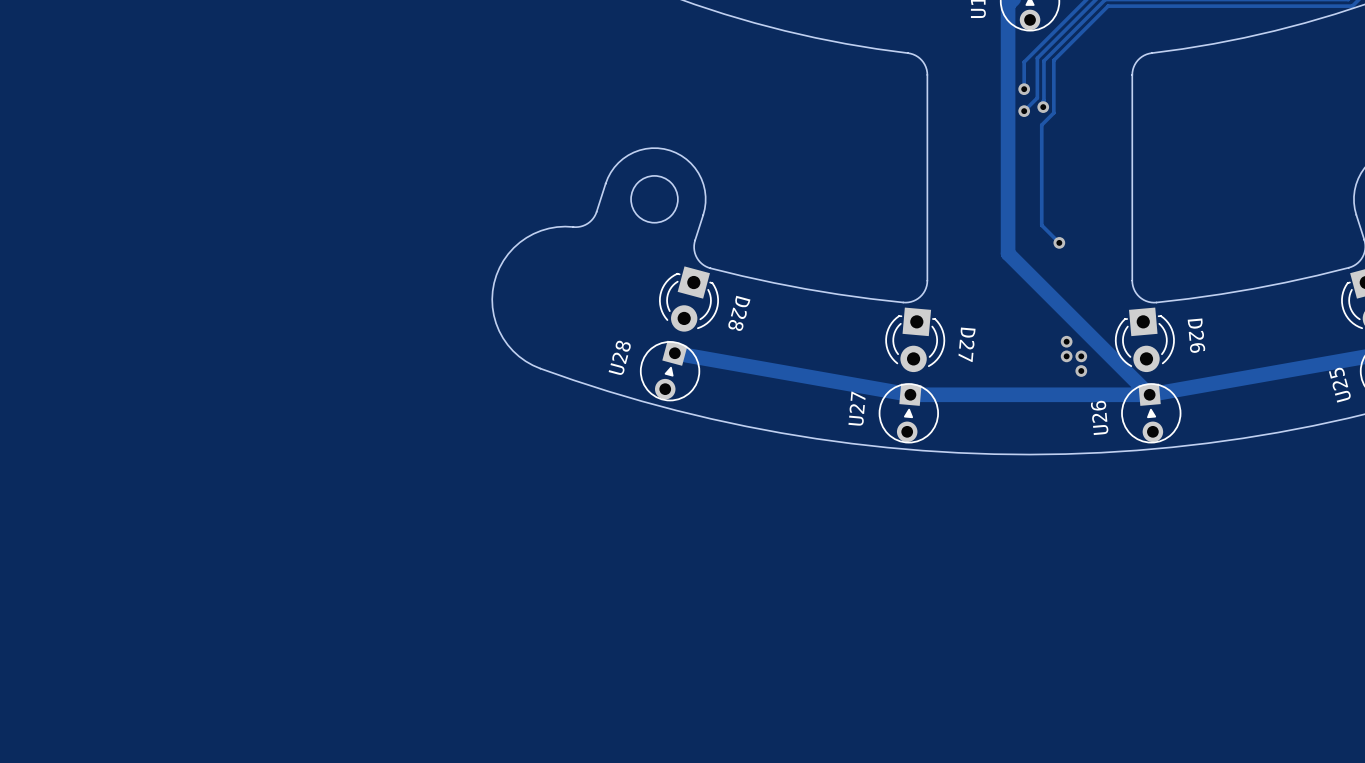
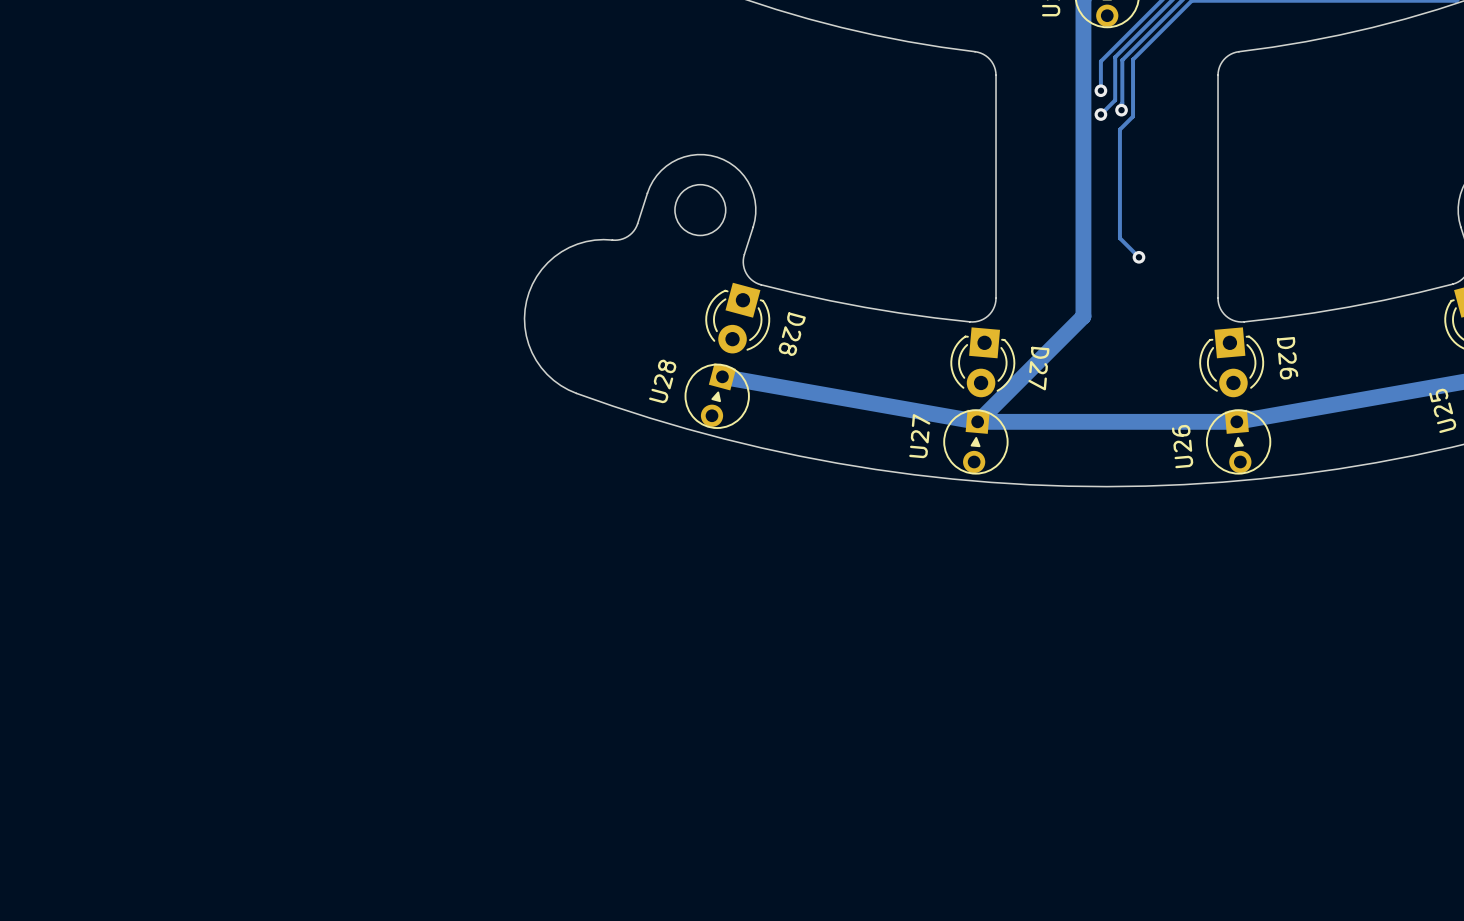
track: (1008, 253) (1149, 394) -> (1083, 268) (1083, 316) (978, 421)
via: (1066, 341) -> none
via: (1066, 356) -> none
via: (1081, 356) -> none
via: (1081, 371) -> none

